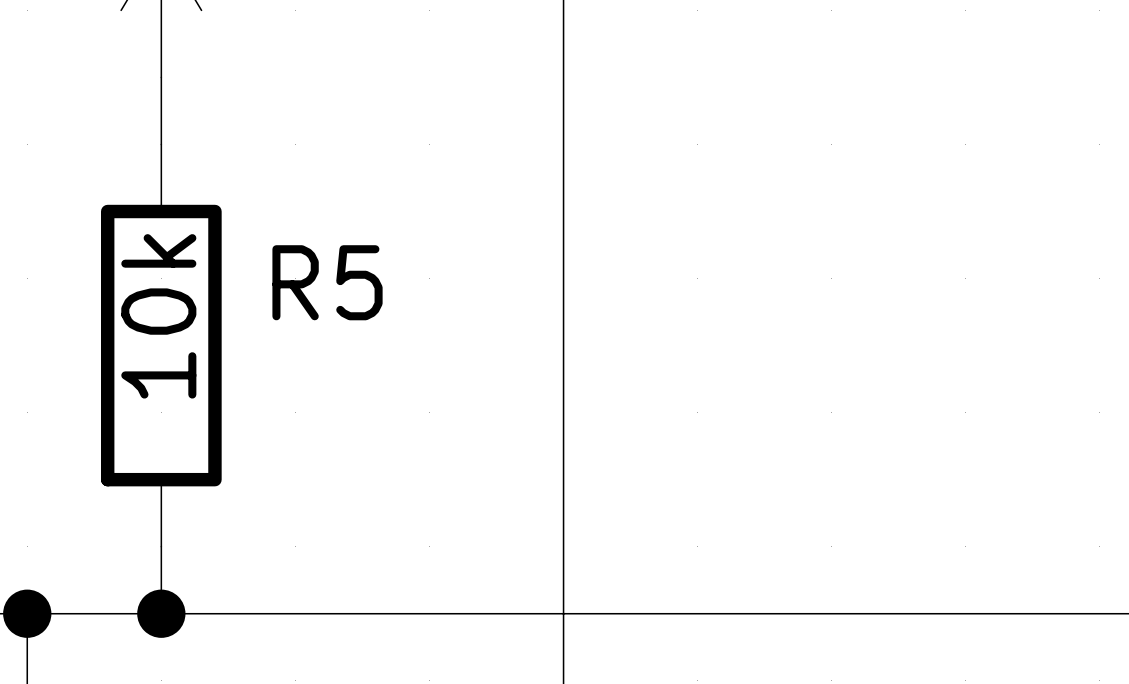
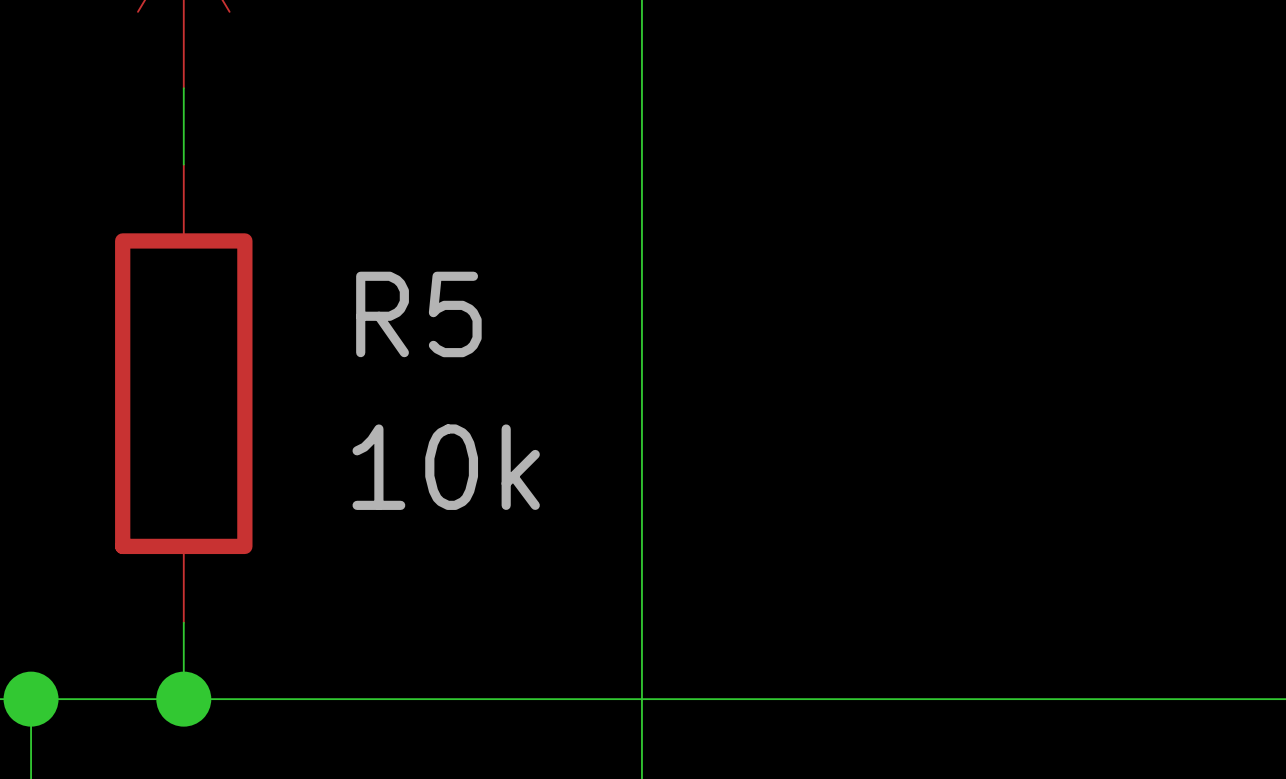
R5 name position: R5 (327, 282) -> R5 (418, 314)
R5 value rotation: 0° (158, 316) -> 90° clockwise (446, 467)
R5 value position: 10k (158, 316) -> 10k (446, 467)

